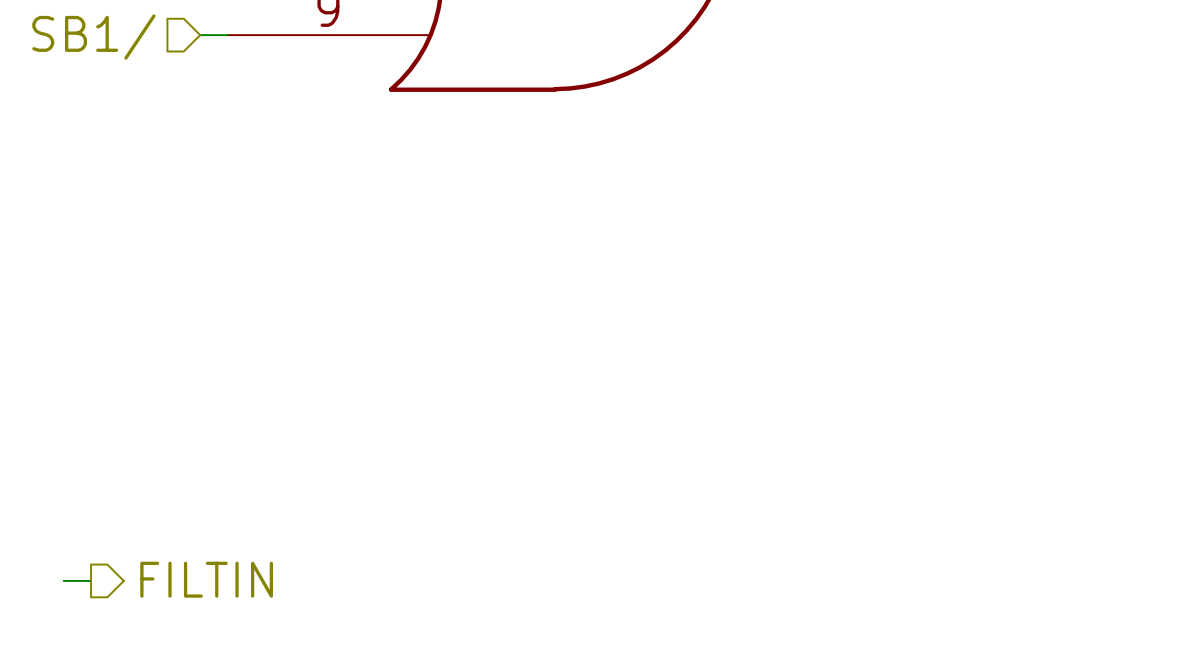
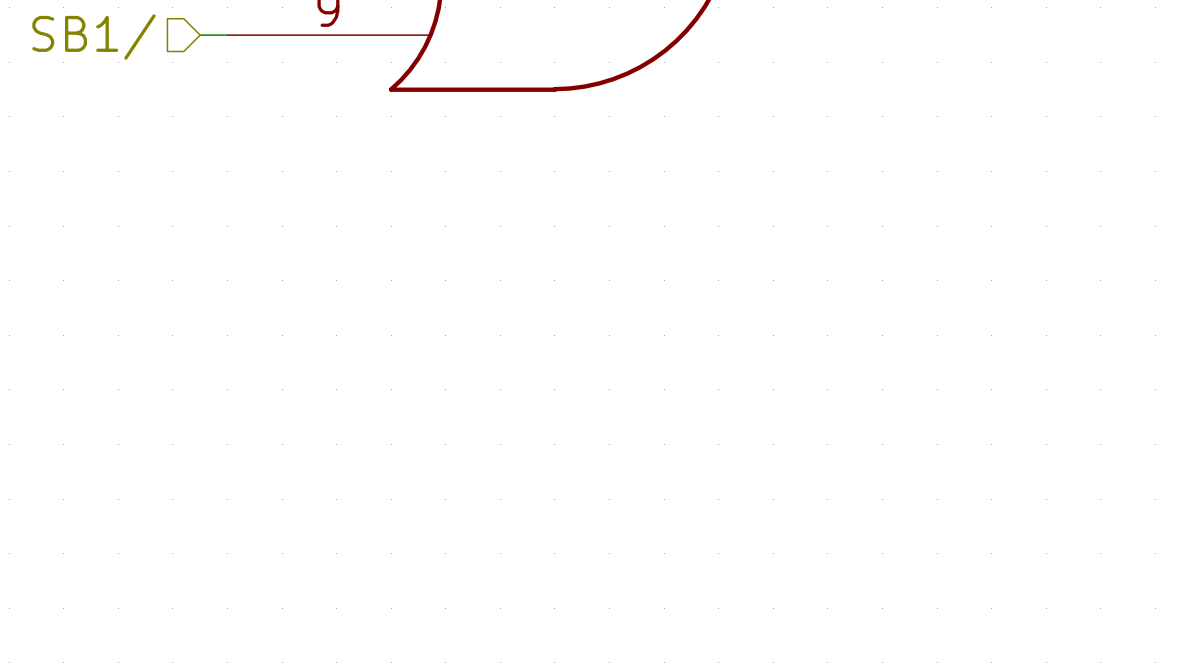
hierarchical label: FILTIN (206, 579) -> none
wire: (63, 580) (91, 580) -> none

